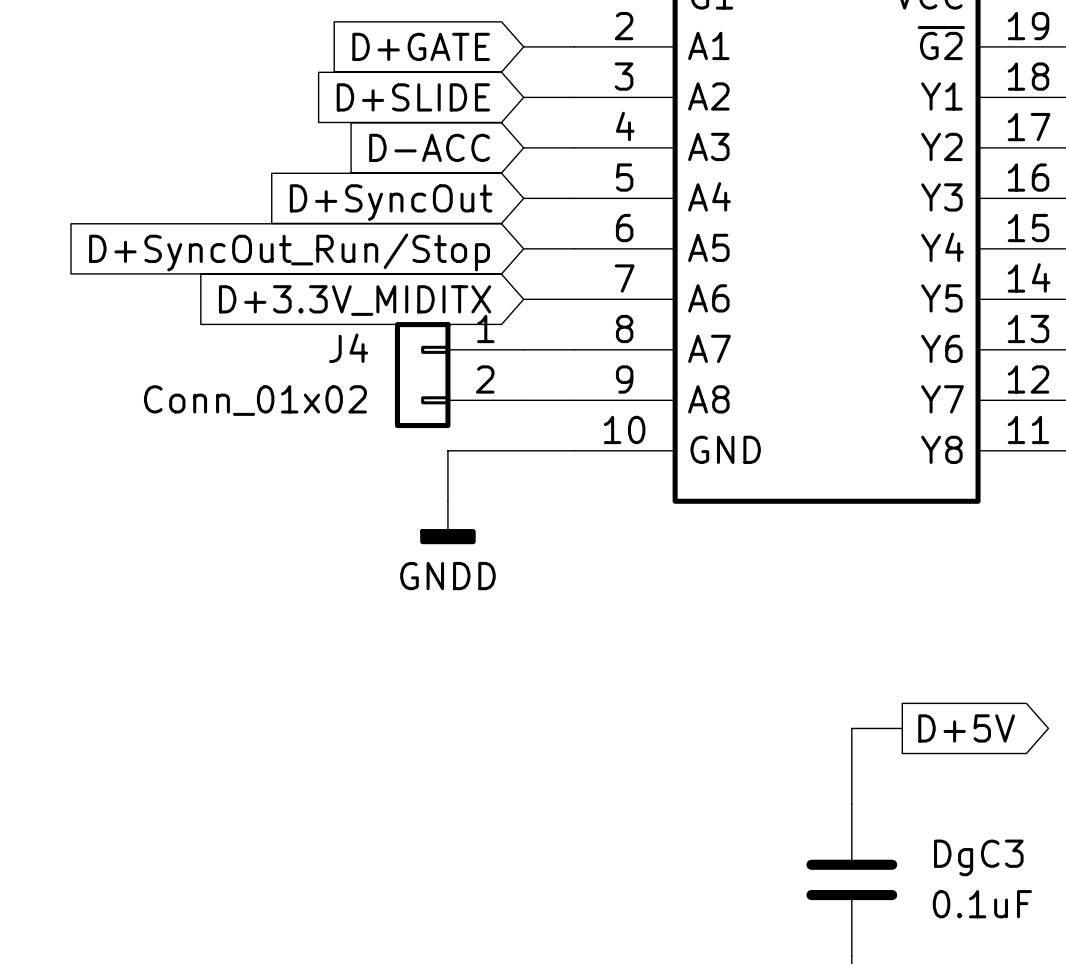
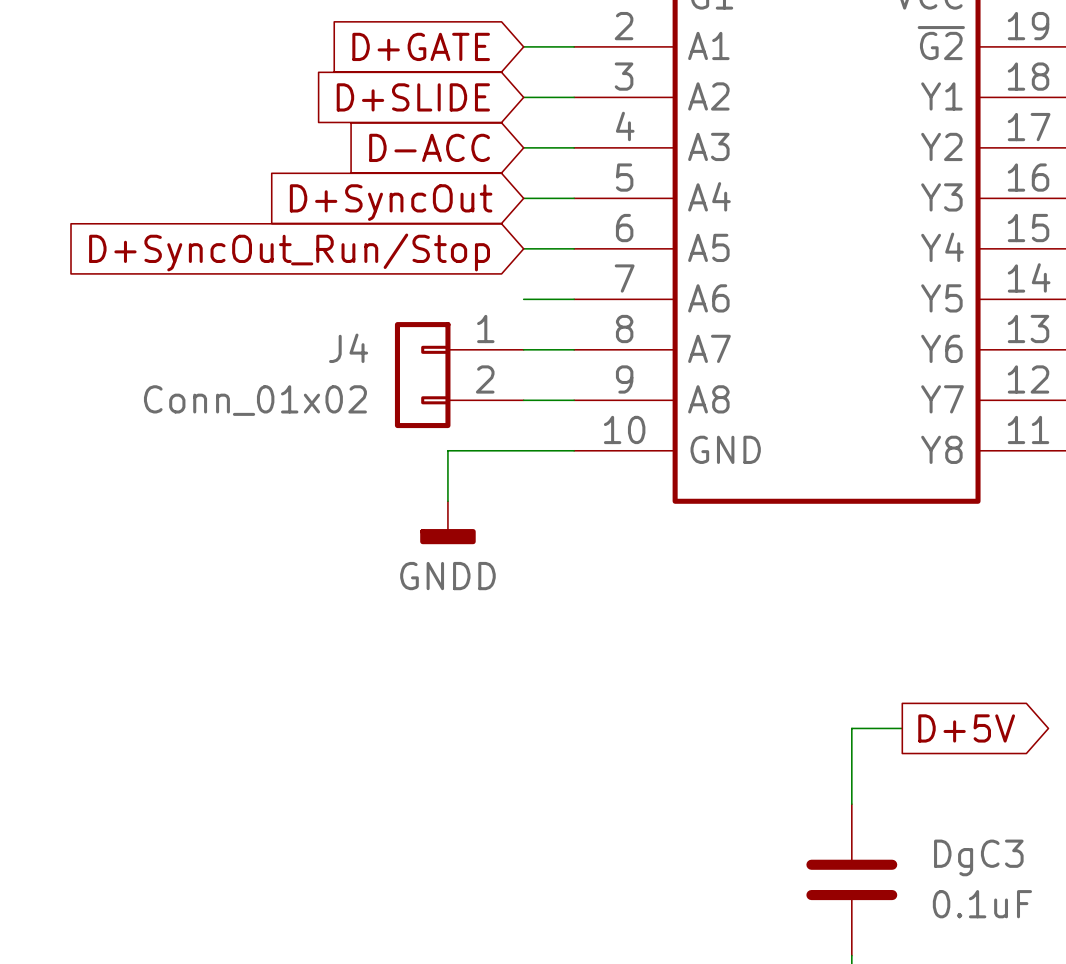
global label: D+3.3V_MIDITX (355, 300) -> none

